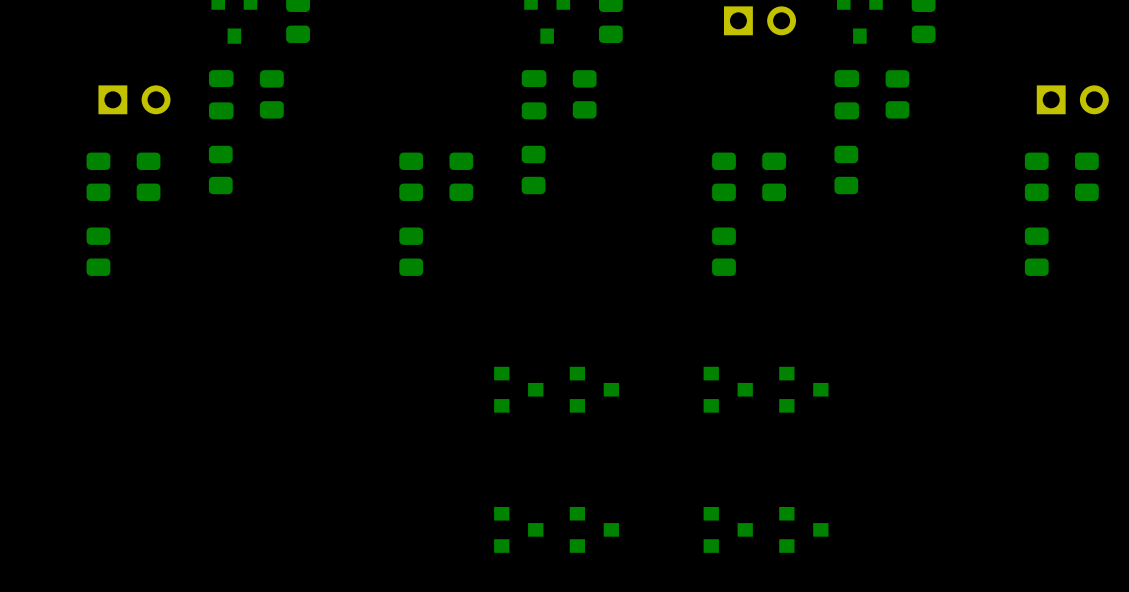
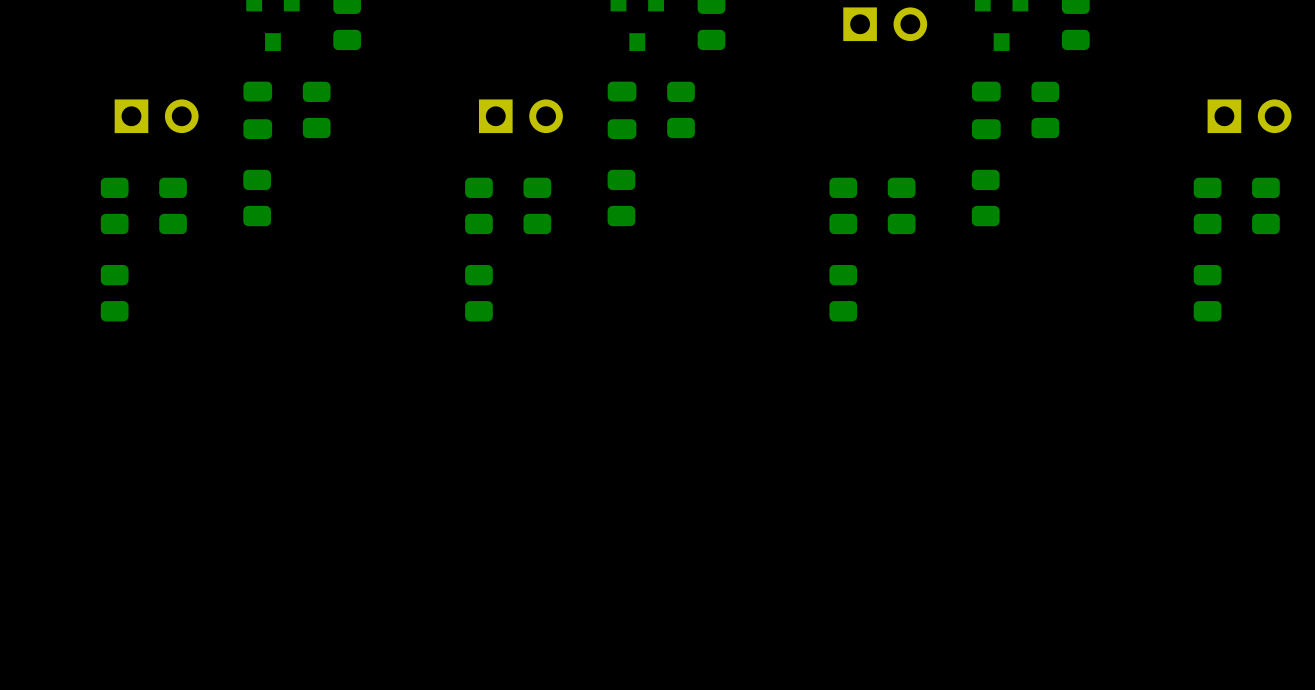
part: none -> (520, 116)
part: (518, 389) -> none
part: (594, 389) -> none
part: (728, 389) -> none
part: (803, 389) -> none
part: (518, 529) -> none
part: (594, 529) -> none
part: (728, 529) -> none
part: (803, 529) -> none

